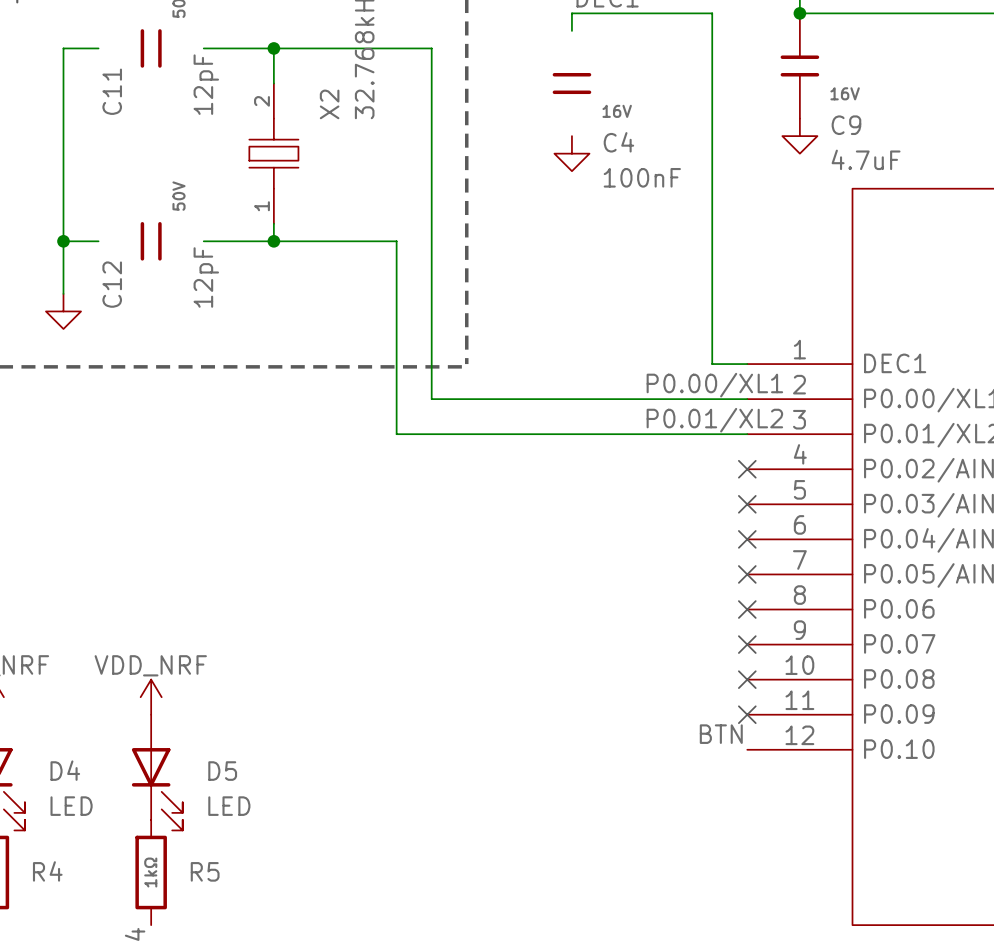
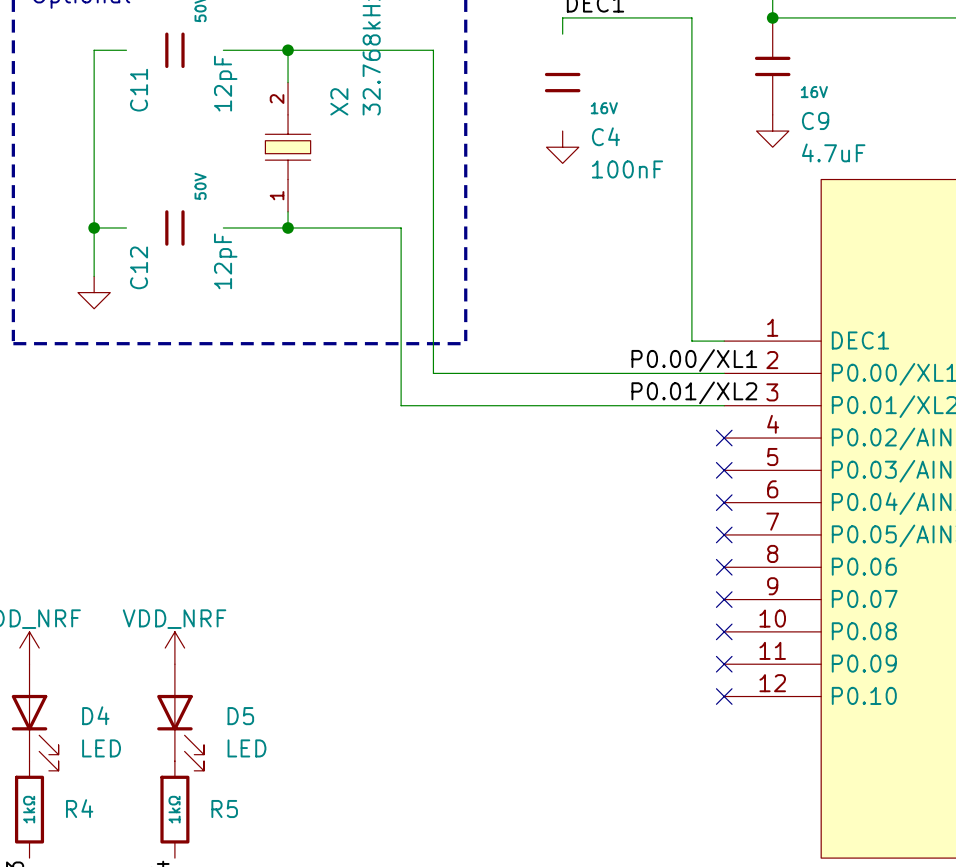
label: BTN (721, 734) -> none
no-connect mark: none -> (724, 696)

